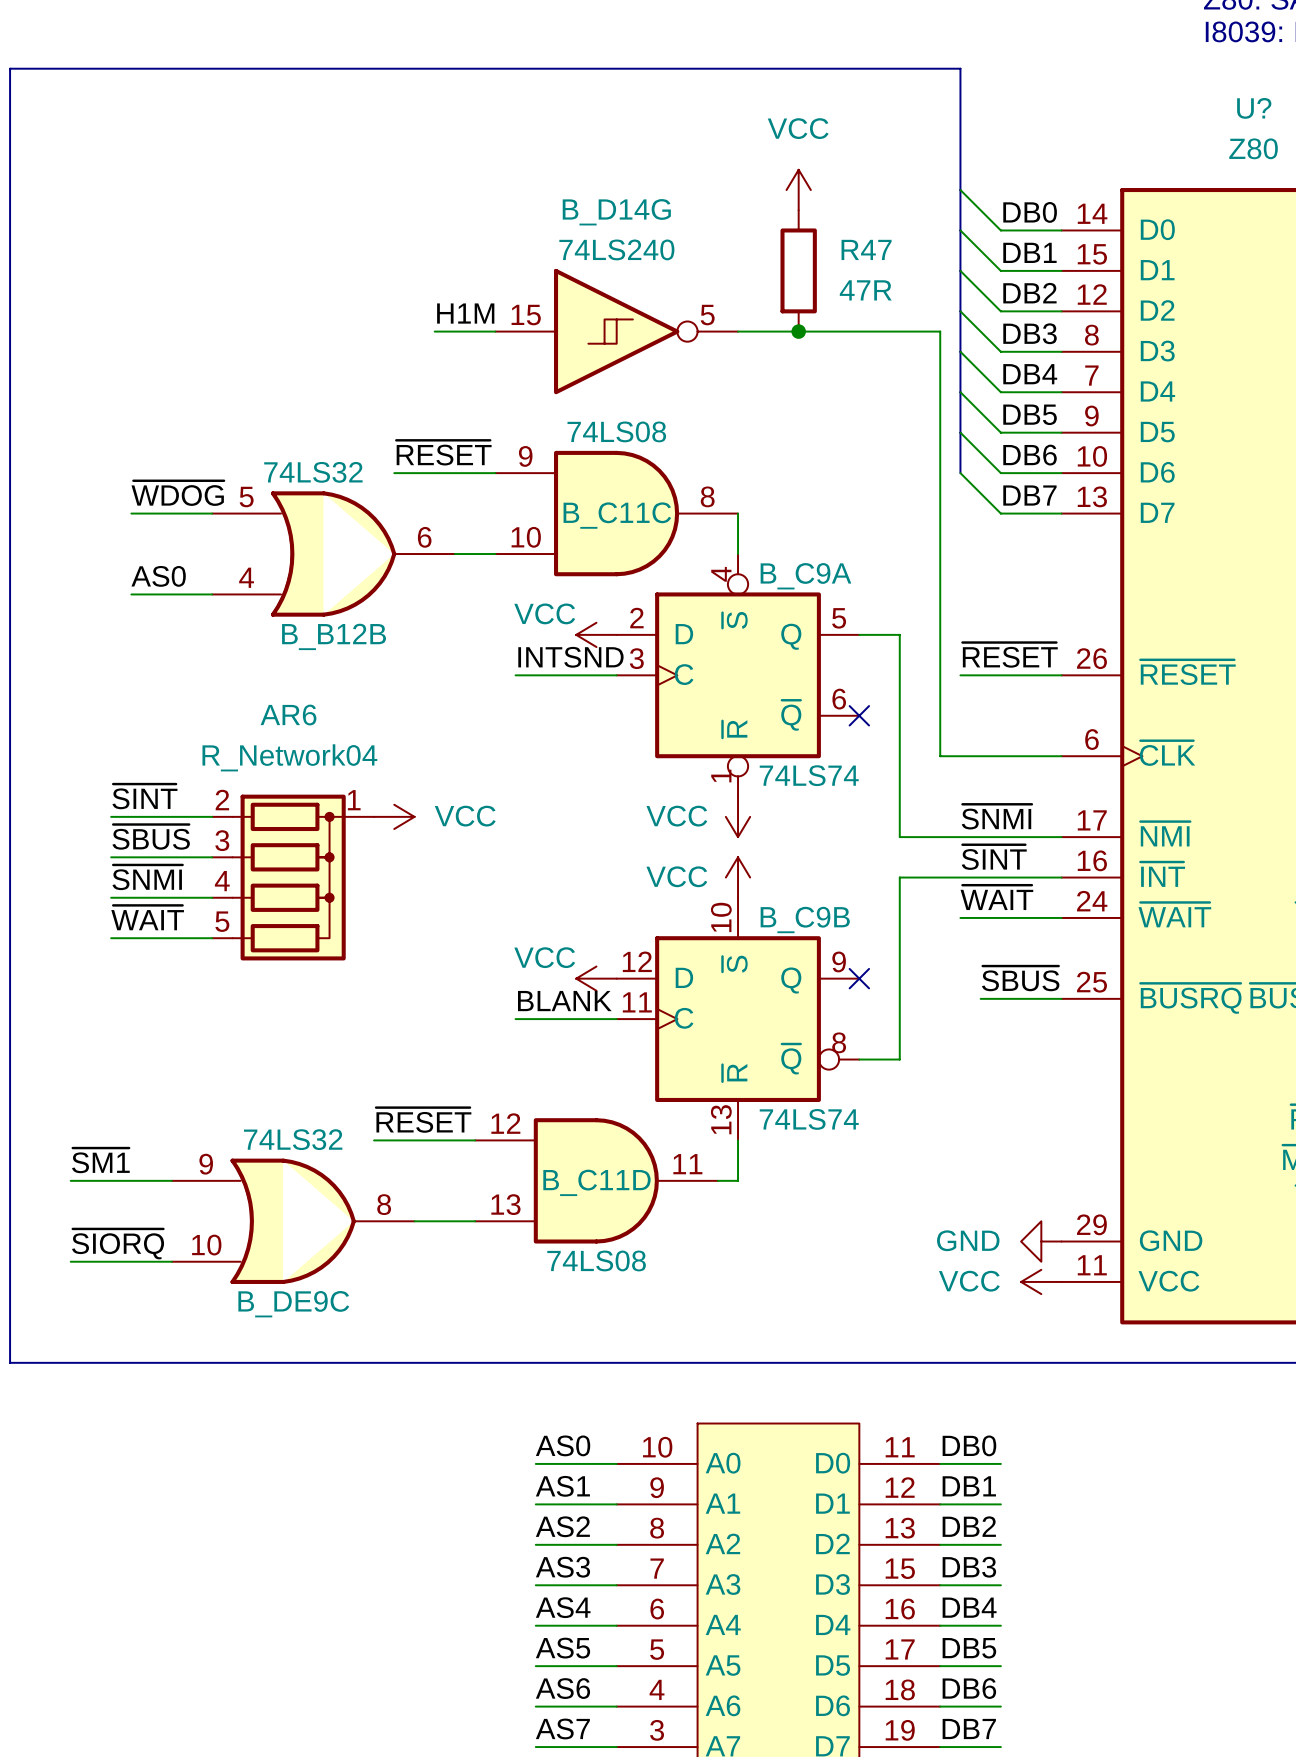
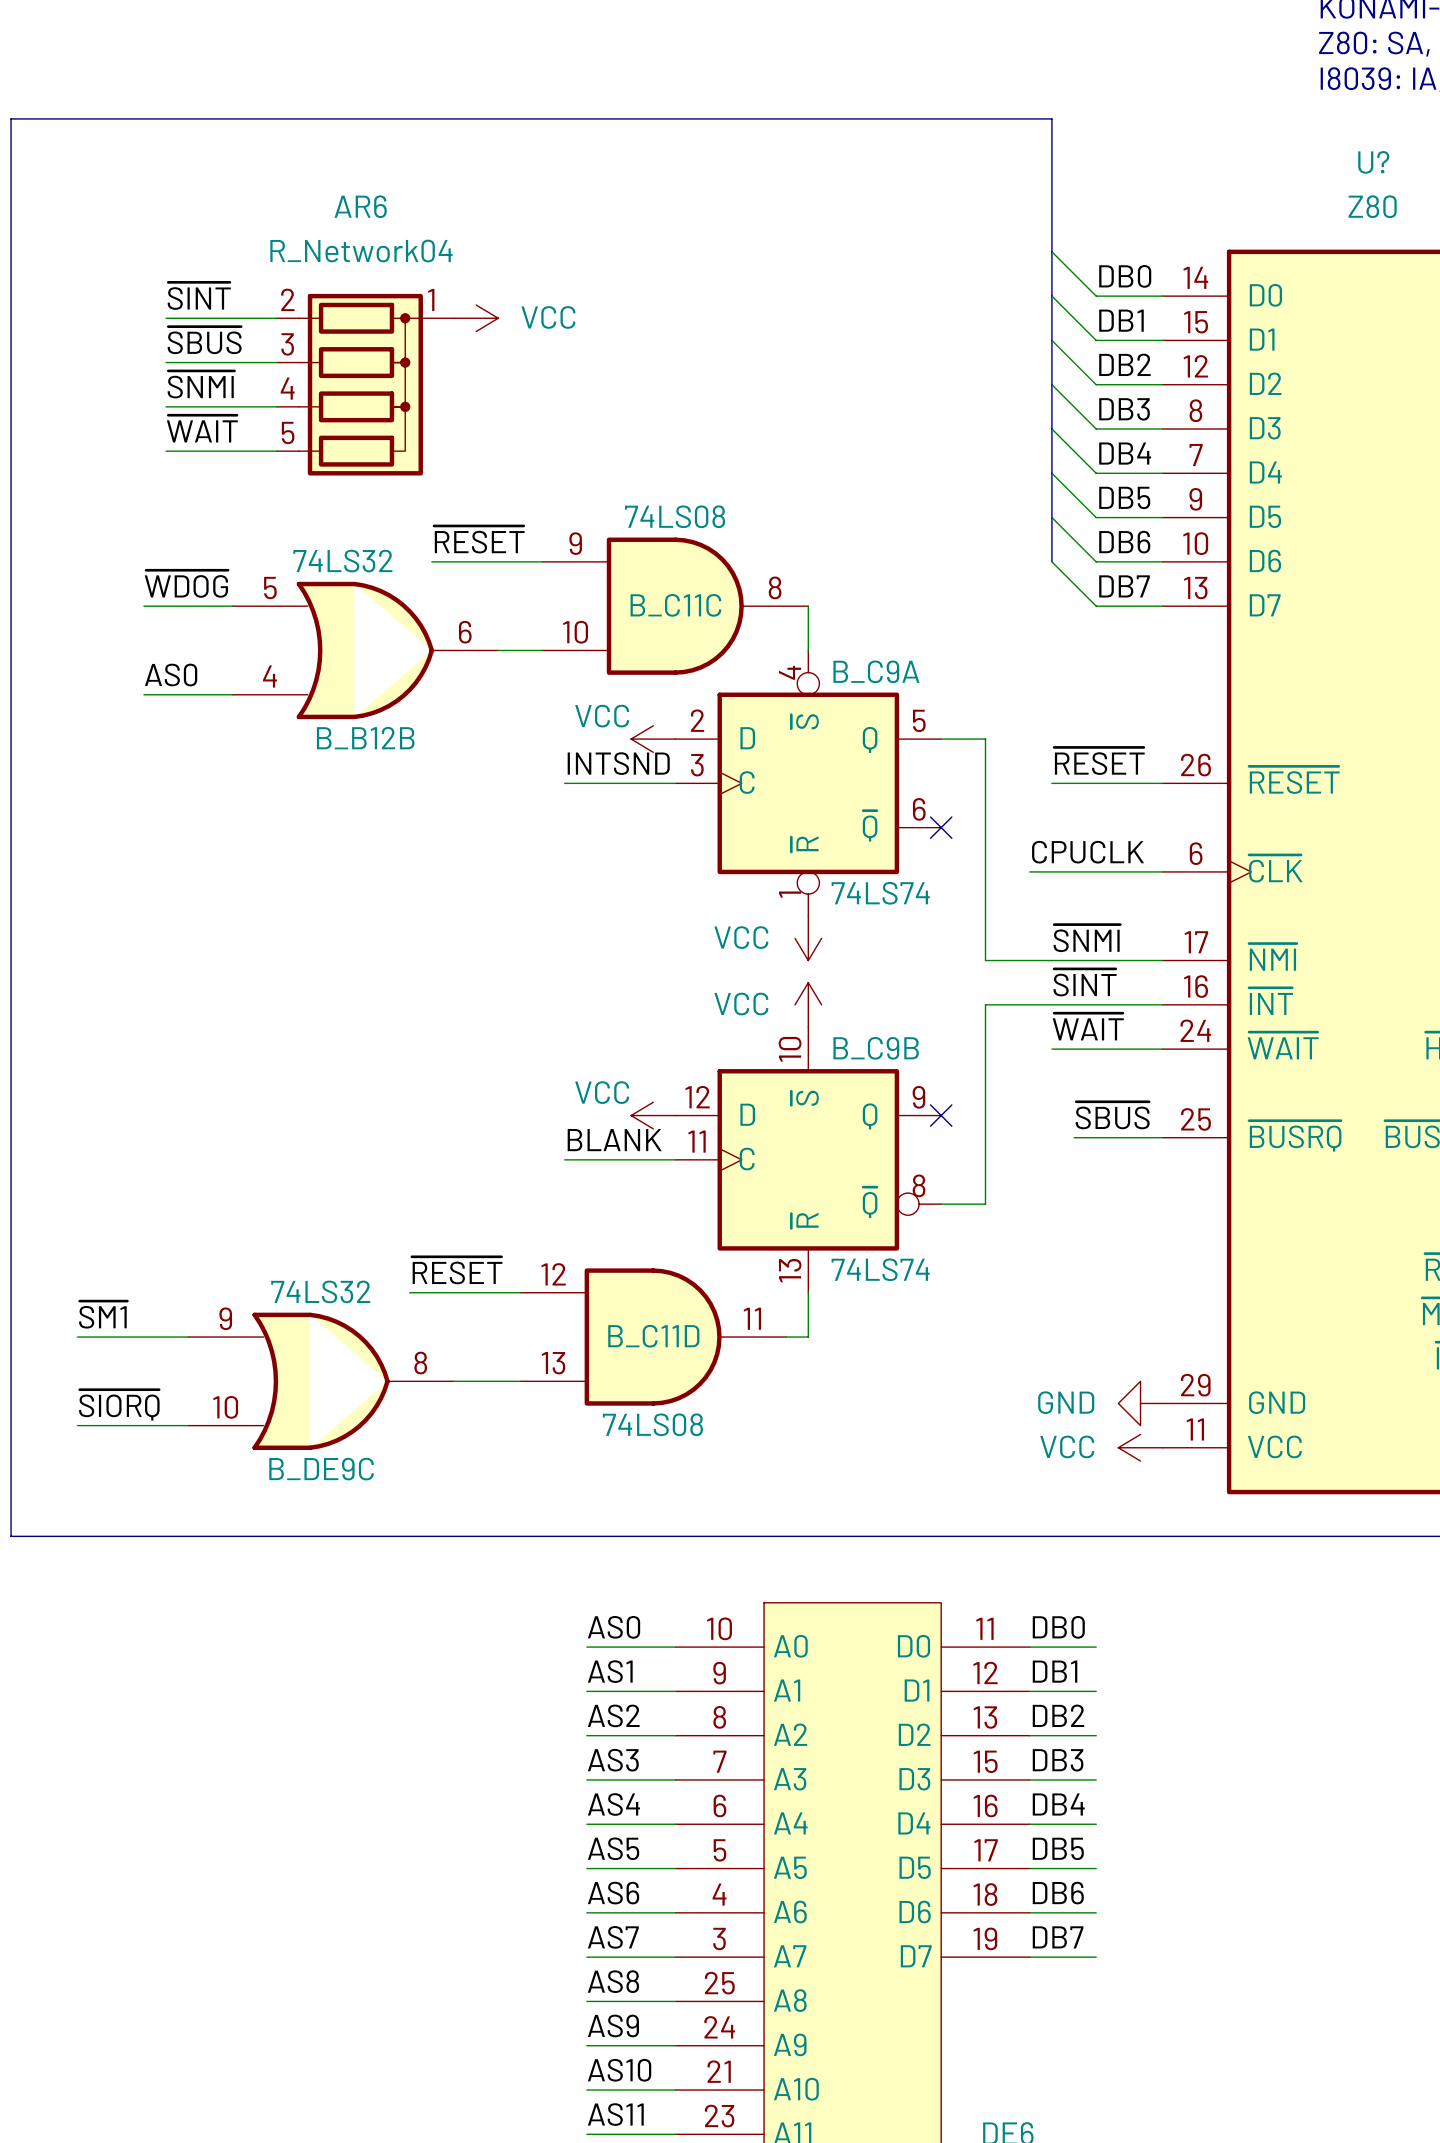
power symbol: VCC (798, 190) -> none
label: none -> ~{SINT} (199, 296)
wire: none -> (166, 318) (276, 318)
power symbol: none -> VCC (476, 318)
label: none -> ~{SBUS} (204, 340)
R47: 47R (798, 270) -> none
wire: none -> (166, 362) (276, 362)
label: none -> ~{SNMI} (201, 384)
label: H1M (465, 313) -> none
wire: none -> (166, 406) (276, 406)
wire: (434, 331) (495, 331) -> none
B_D14G: 74LS240 (616, 331) -> none
wire: (738, 331) (940, 331) (940, 756) -> none
junction: (798, 331) -> none
label: none -> ~{WAIT} (202, 428)
wire: none -> (166, 451) (276, 451)
label: none -> CPUCLK (1087, 852)
label: ~{SINT} (144, 796) -> none
wire: (111, 816) (212, 816) -> none
power symbol: VCC (394, 816) -> none
label: ~{SBUS} (151, 837) -> none
wire: (111, 857) (212, 857) -> none
label: ~{SNMI} (147, 877) -> none
AR6 position: (293, 877) -> (365, 384)
wire: (111, 897) (212, 897) -> none
label: ~{WAIT} (147, 917) -> none
wire: (111, 938) (212, 938) -> none

